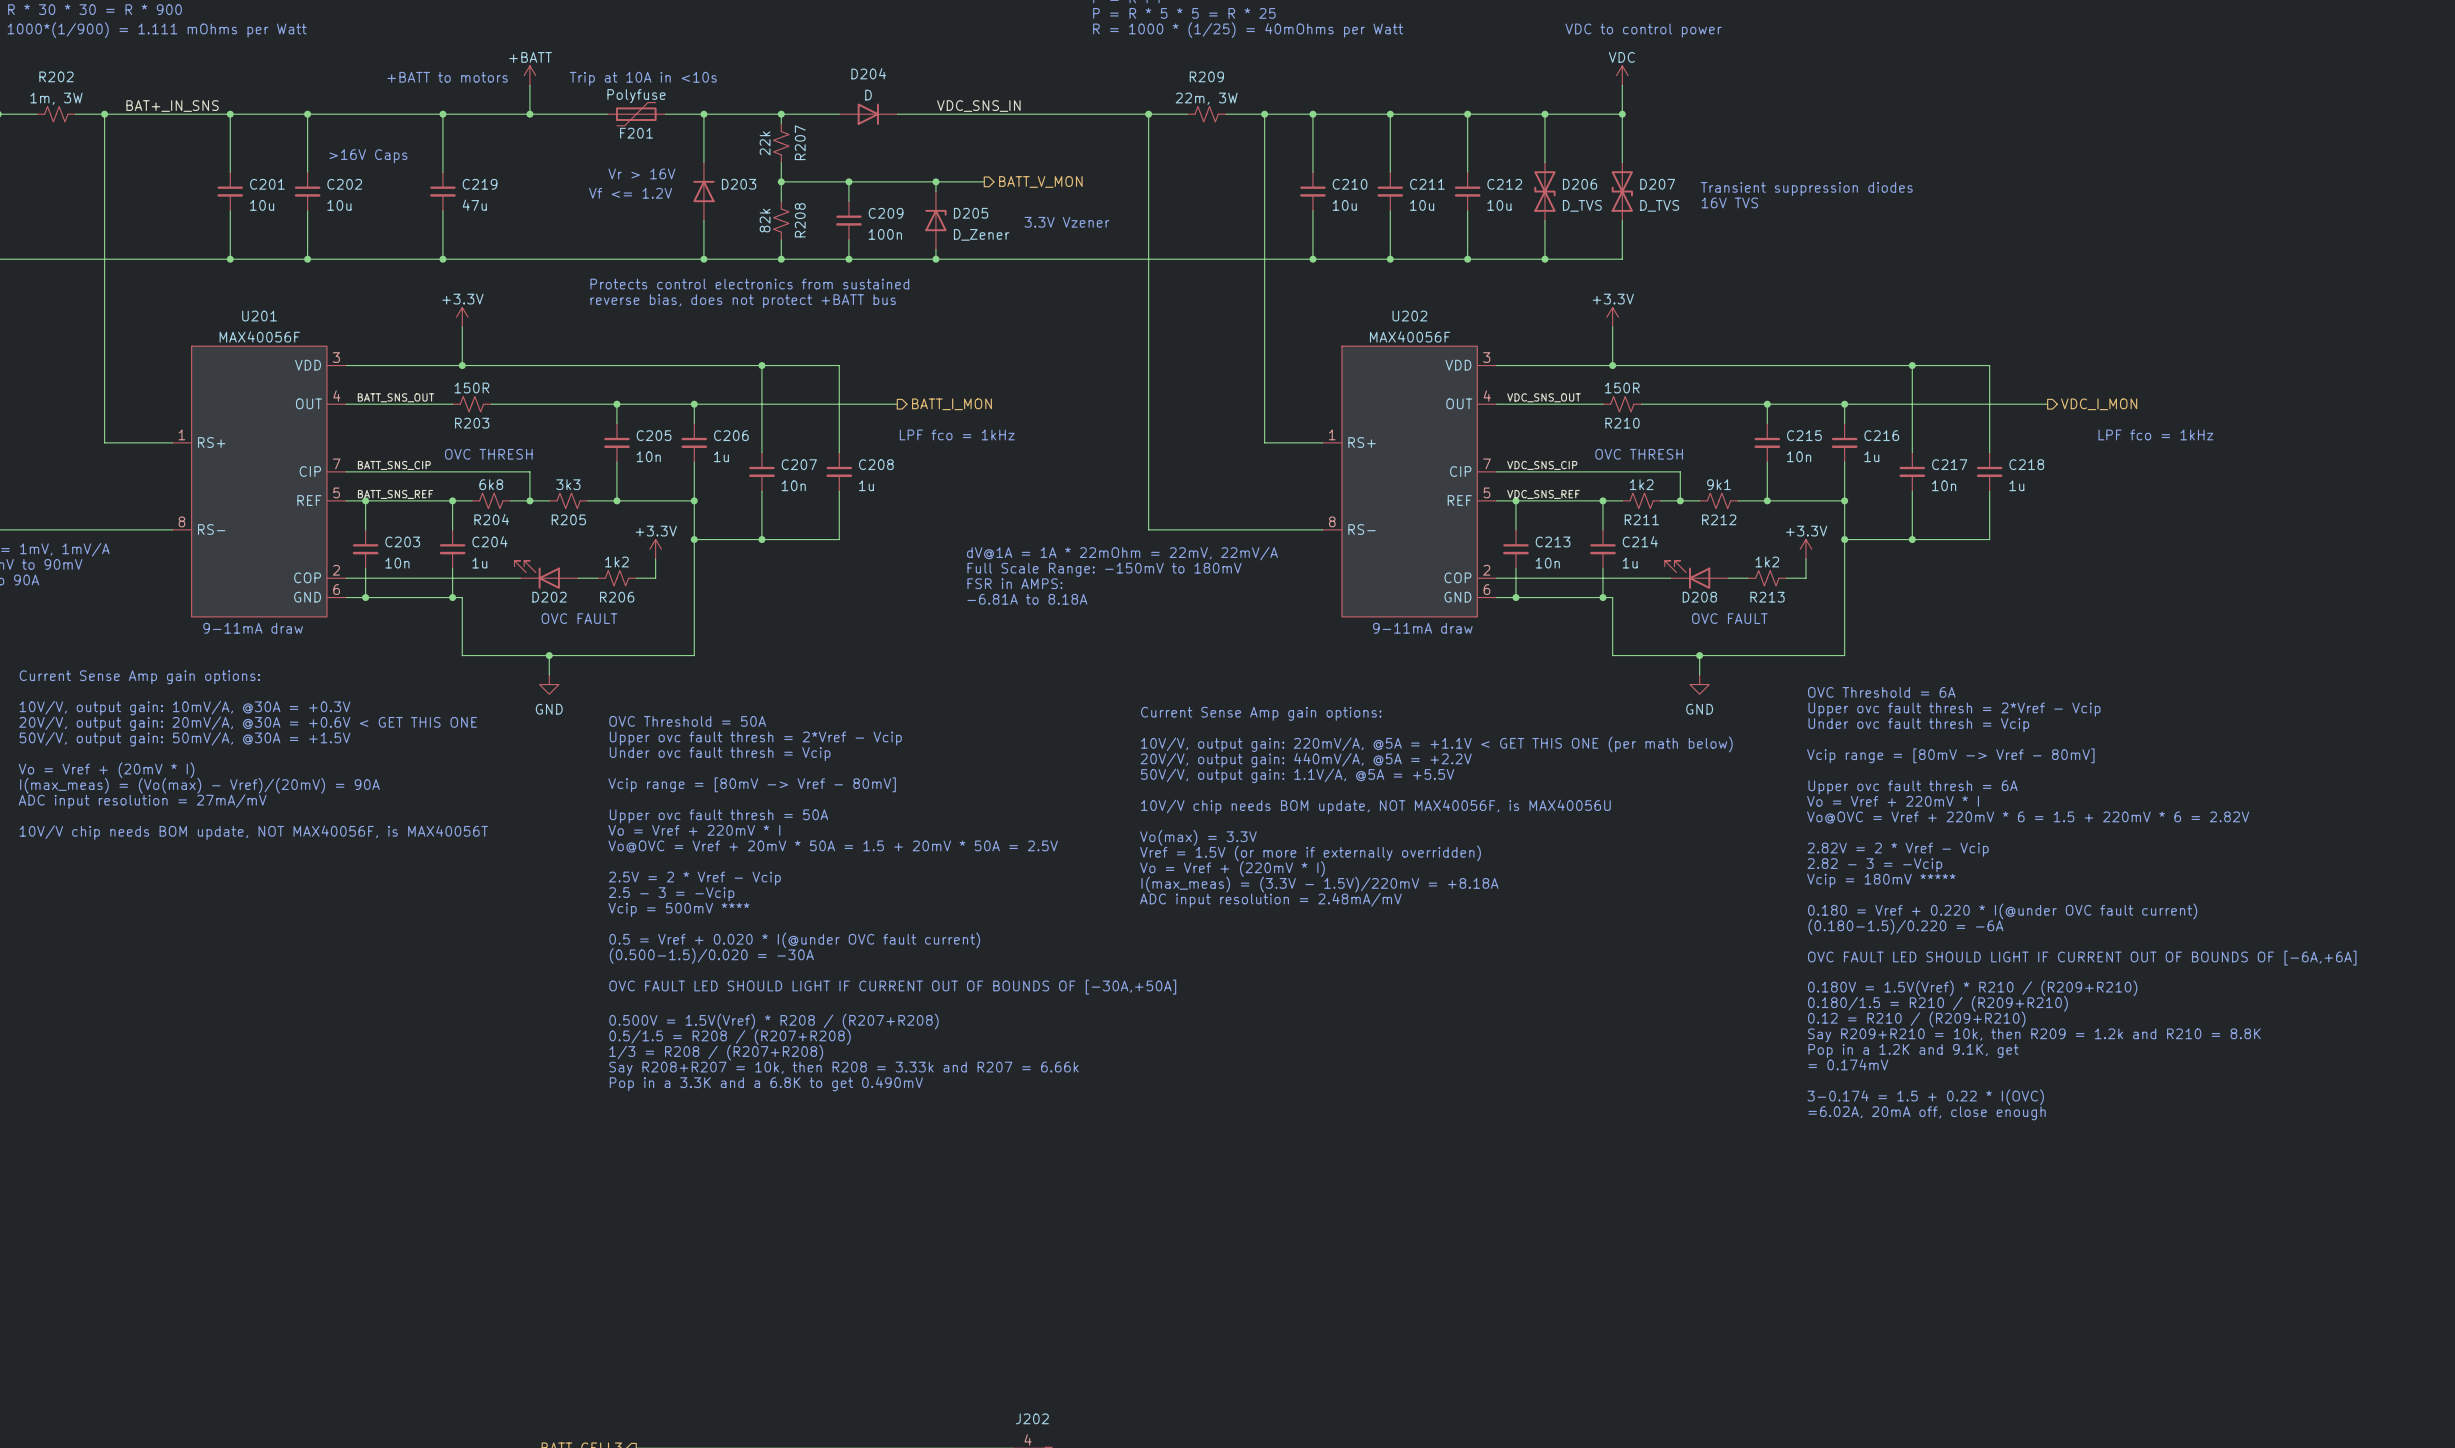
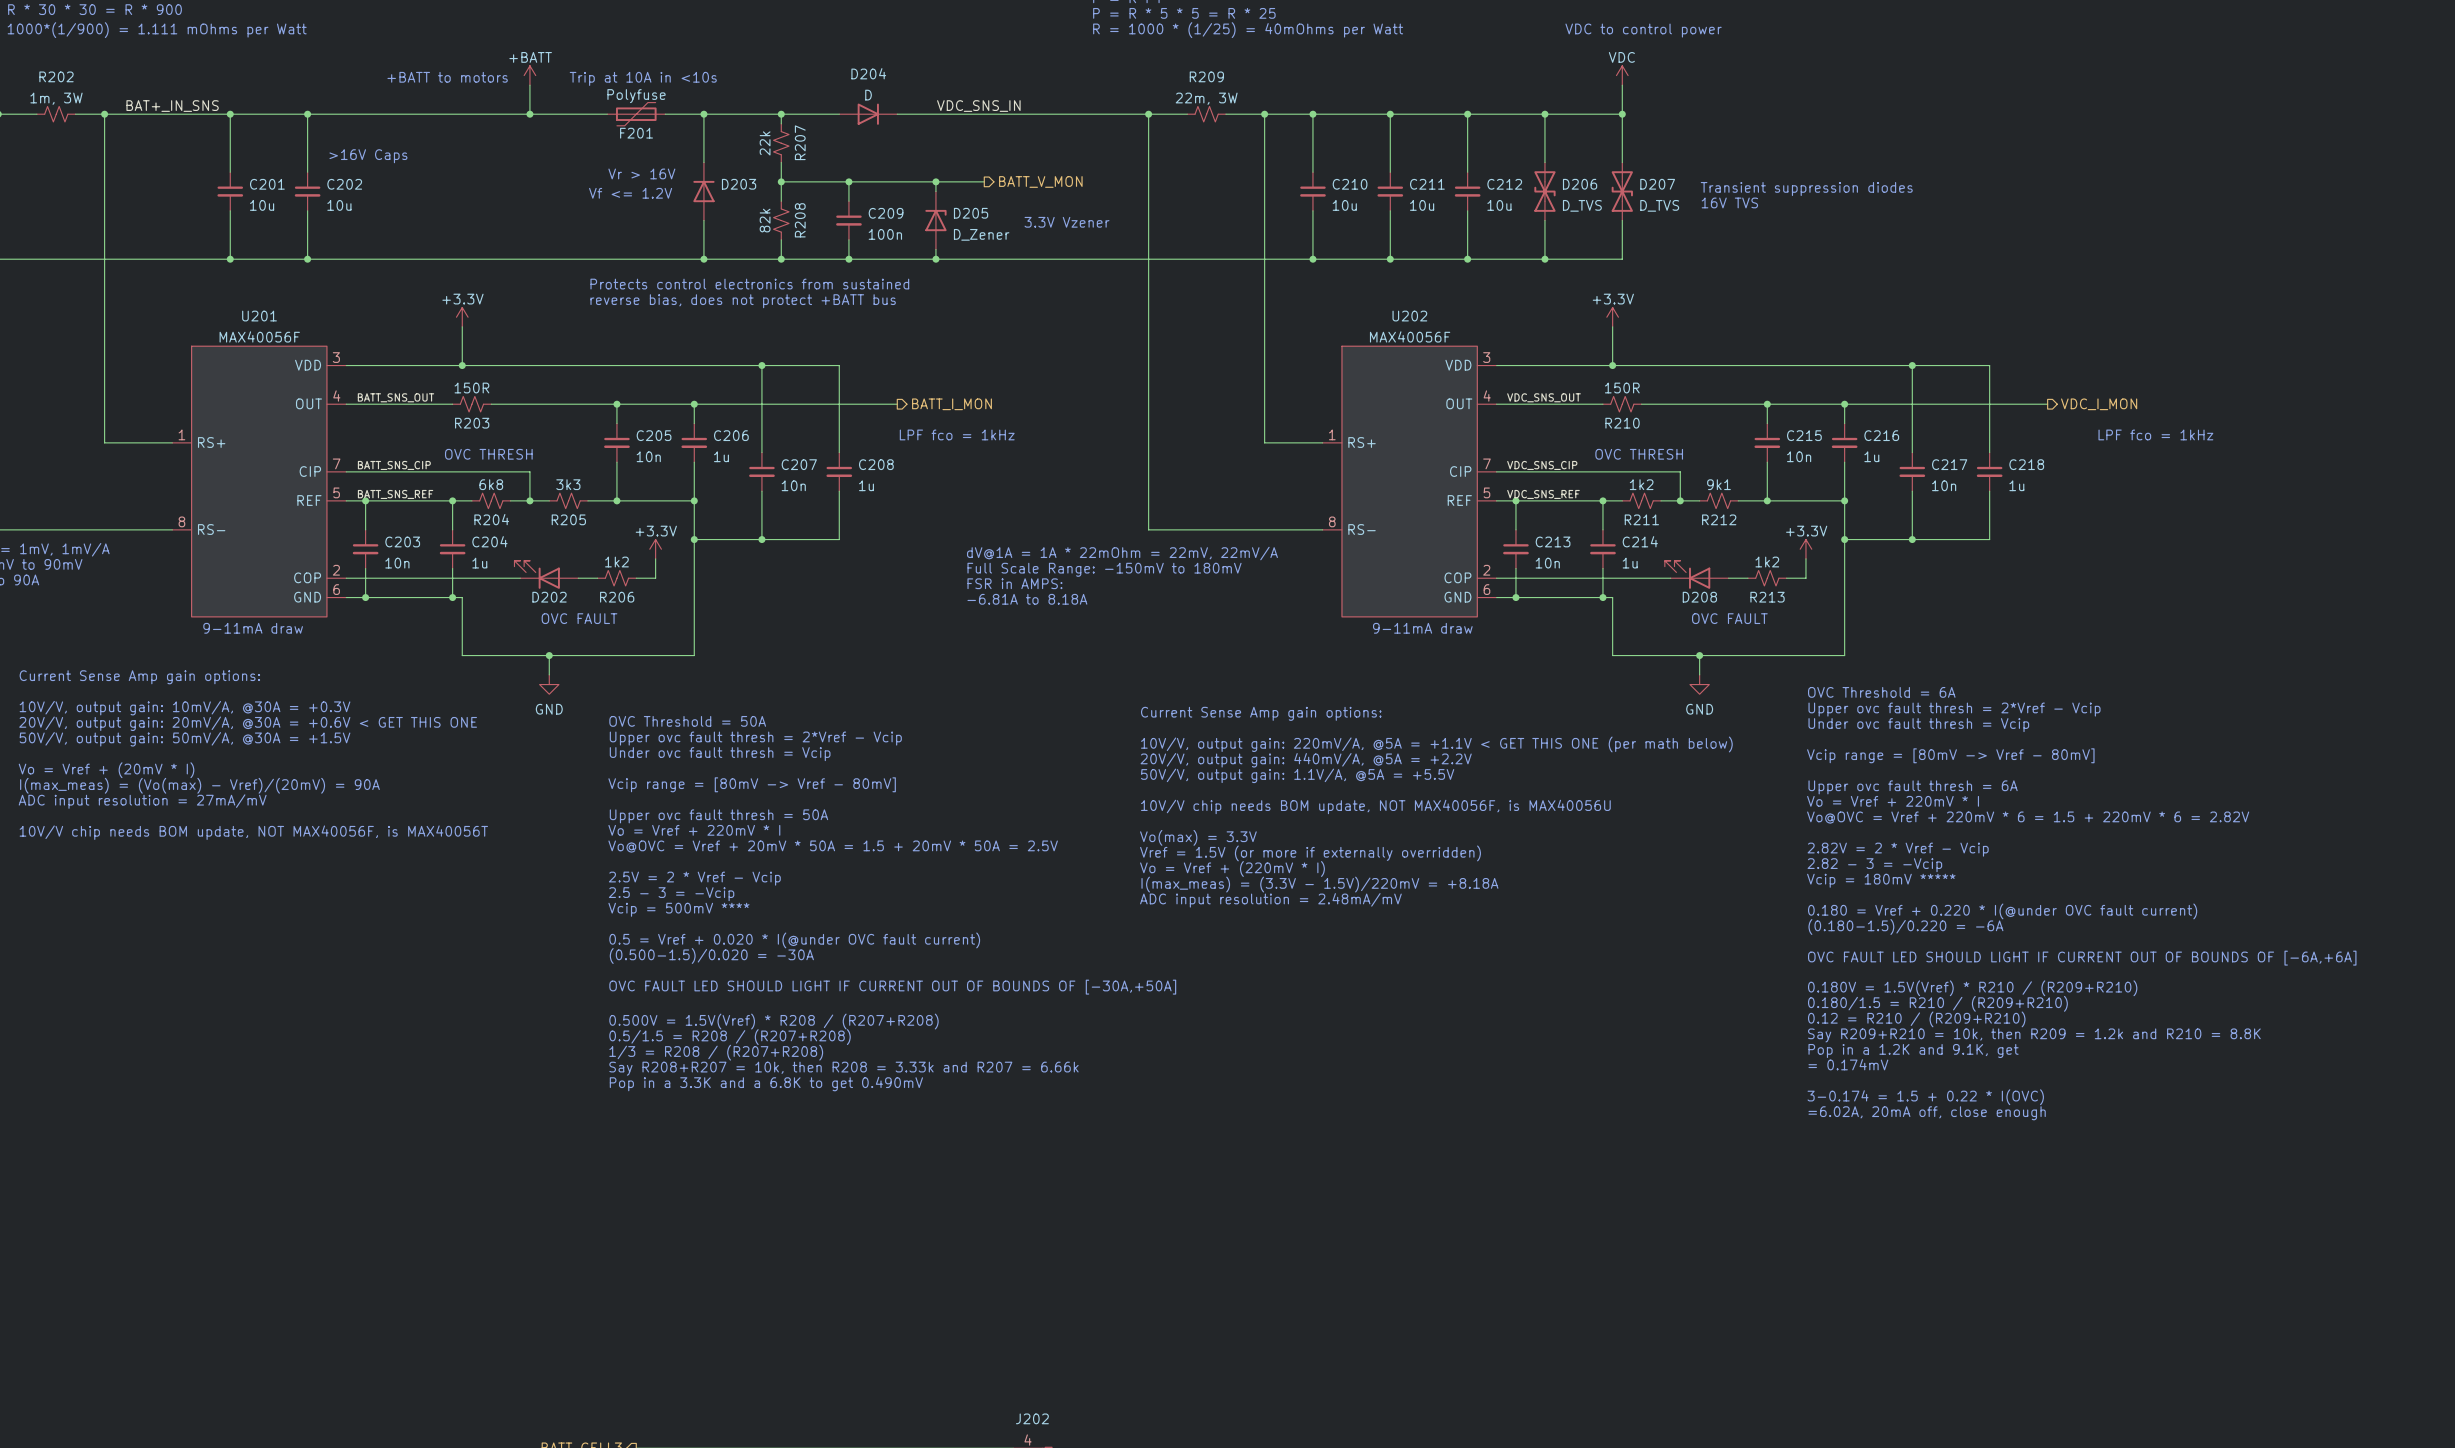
wire: (442, 114) (442, 172) -> none
junction: (442, 114) -> none
C219: 47u (442, 191) -> none
wire: (442, 210) (442, 259) -> none
junction: (442, 259) -> none

